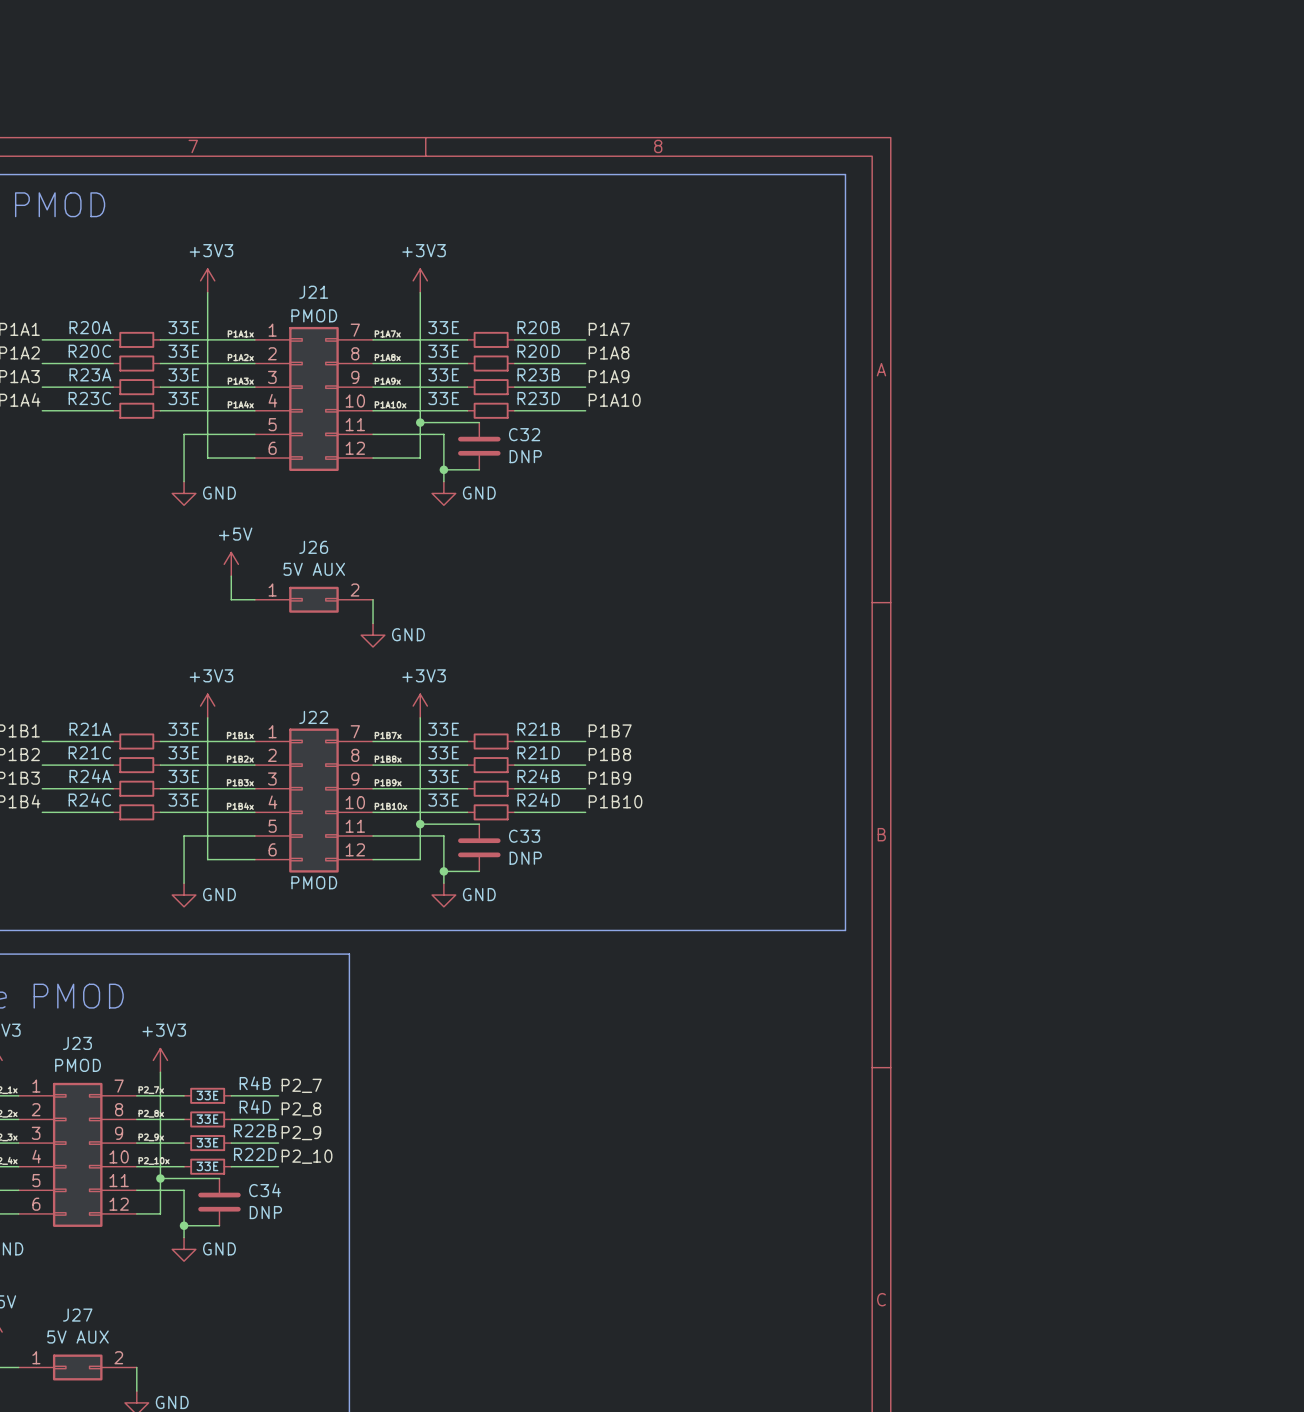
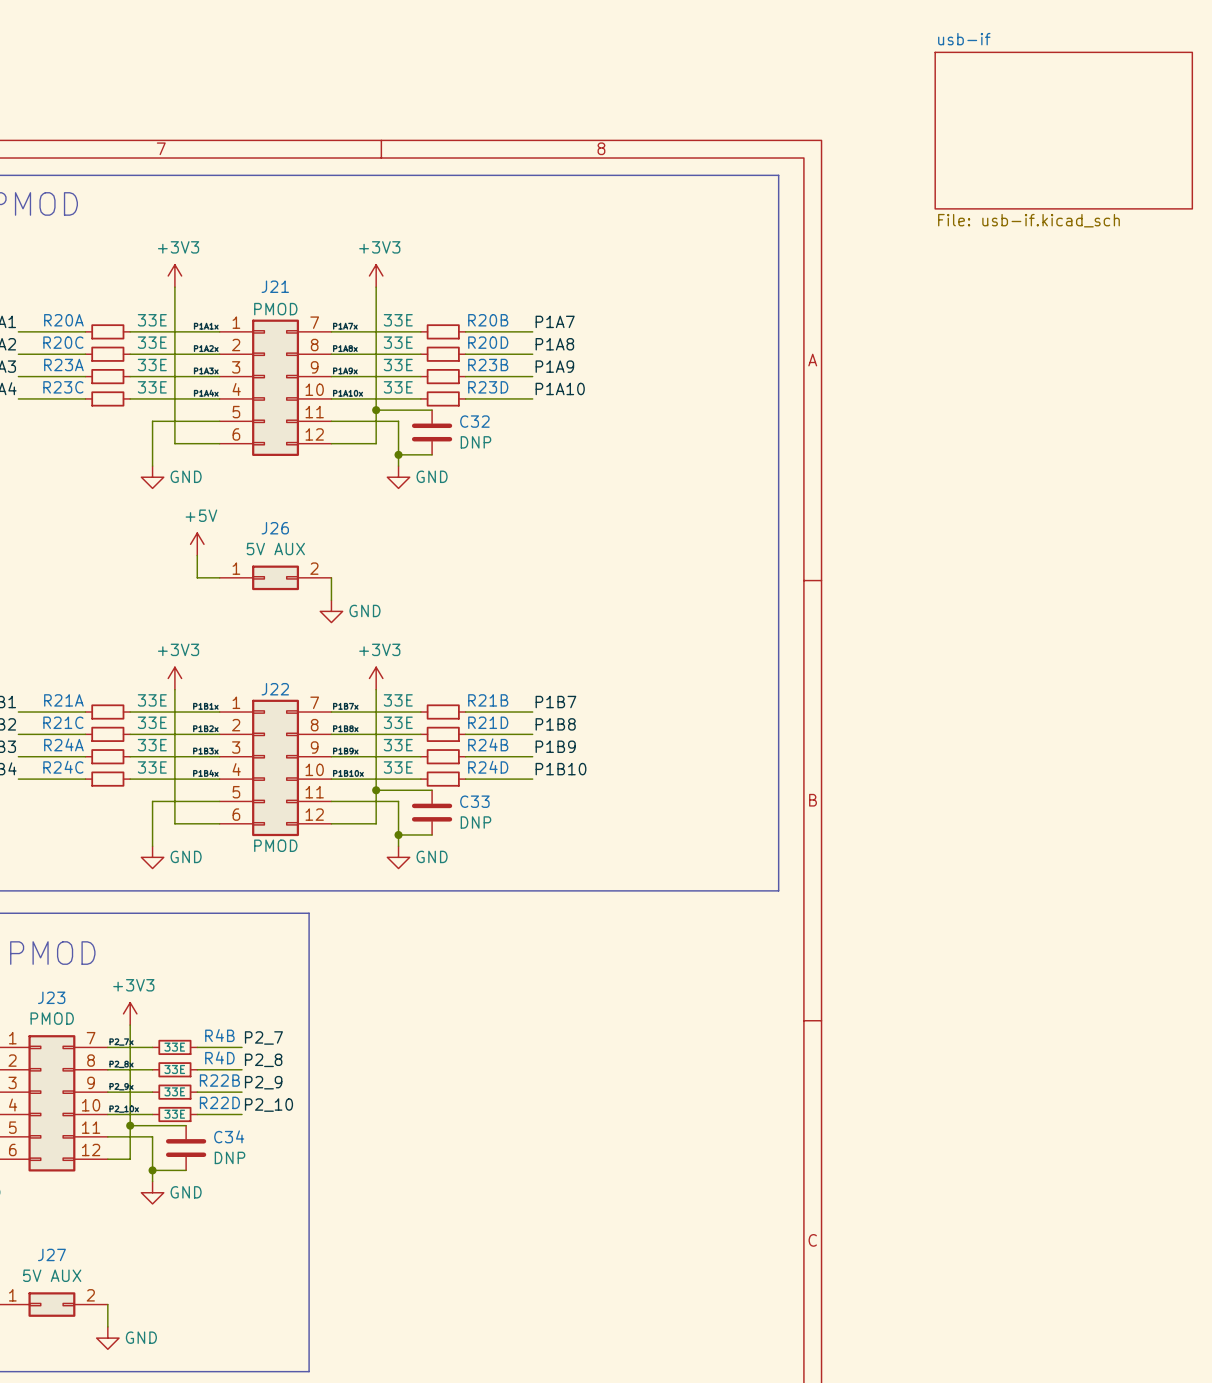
sheet usb-if: none -> File: usb-if.kicad_sch (1063, 130)

